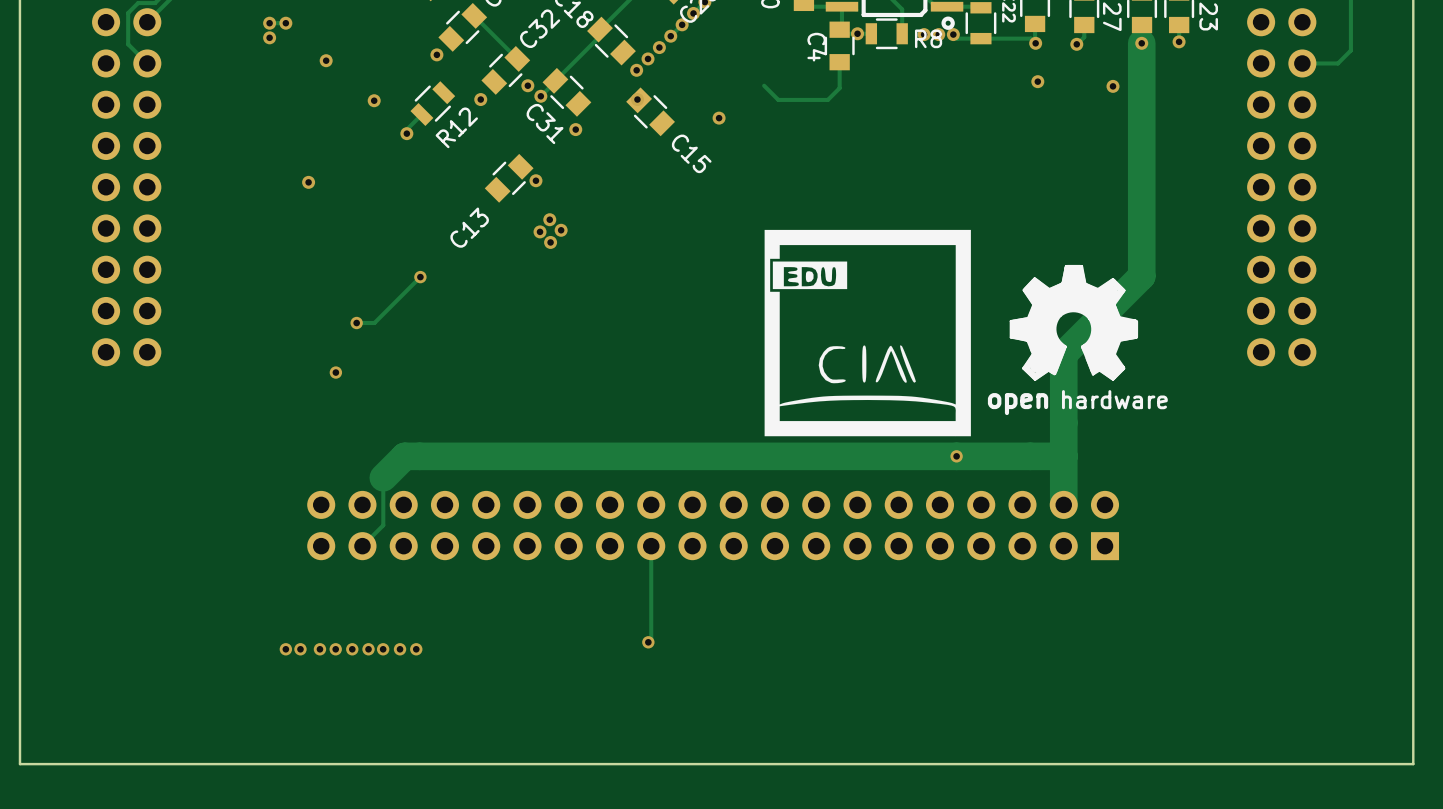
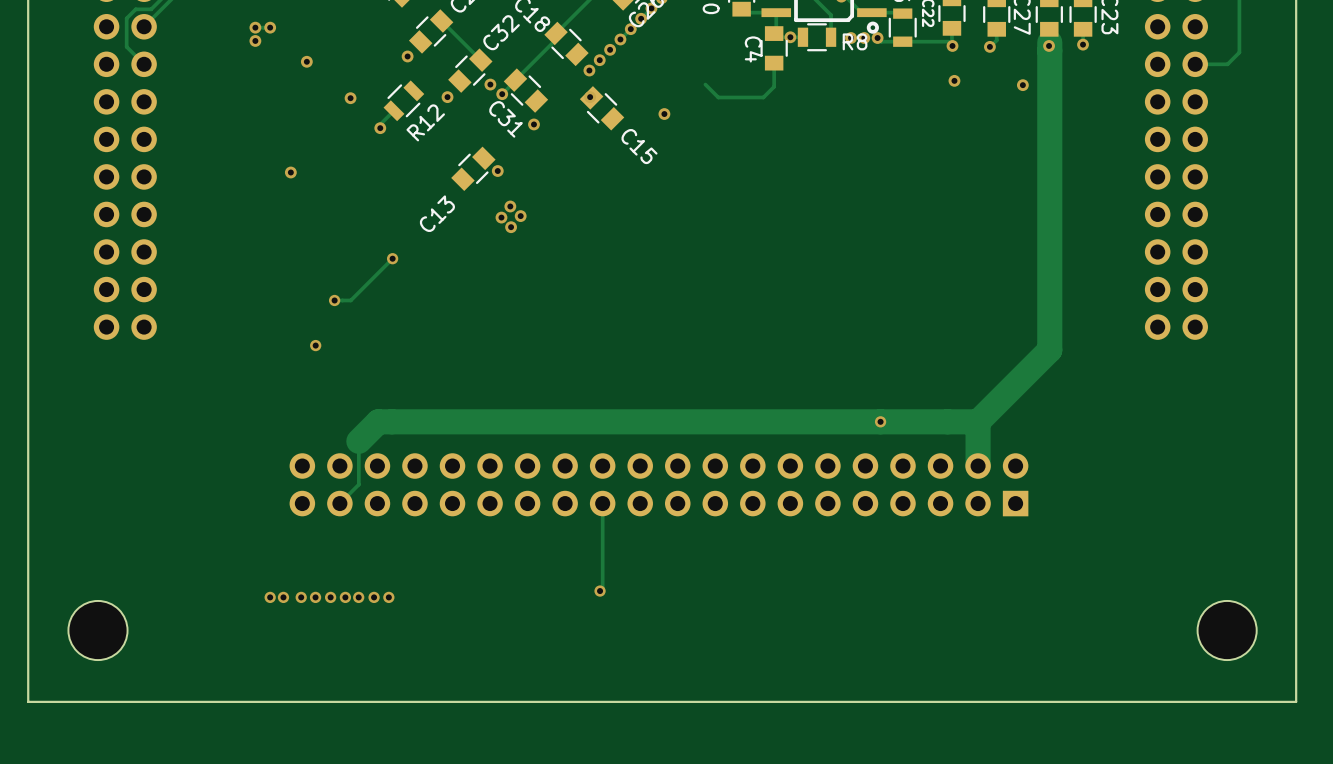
track: (1142, 38) (1141, 276) (1063, 354) (1063, 456) -> (1049, 41) (1049, 350) (978, 421)
drawing: [764, 229, 1139, 437] -> none
part: none -> (97, 630)
part: none -> (1227, 630)

